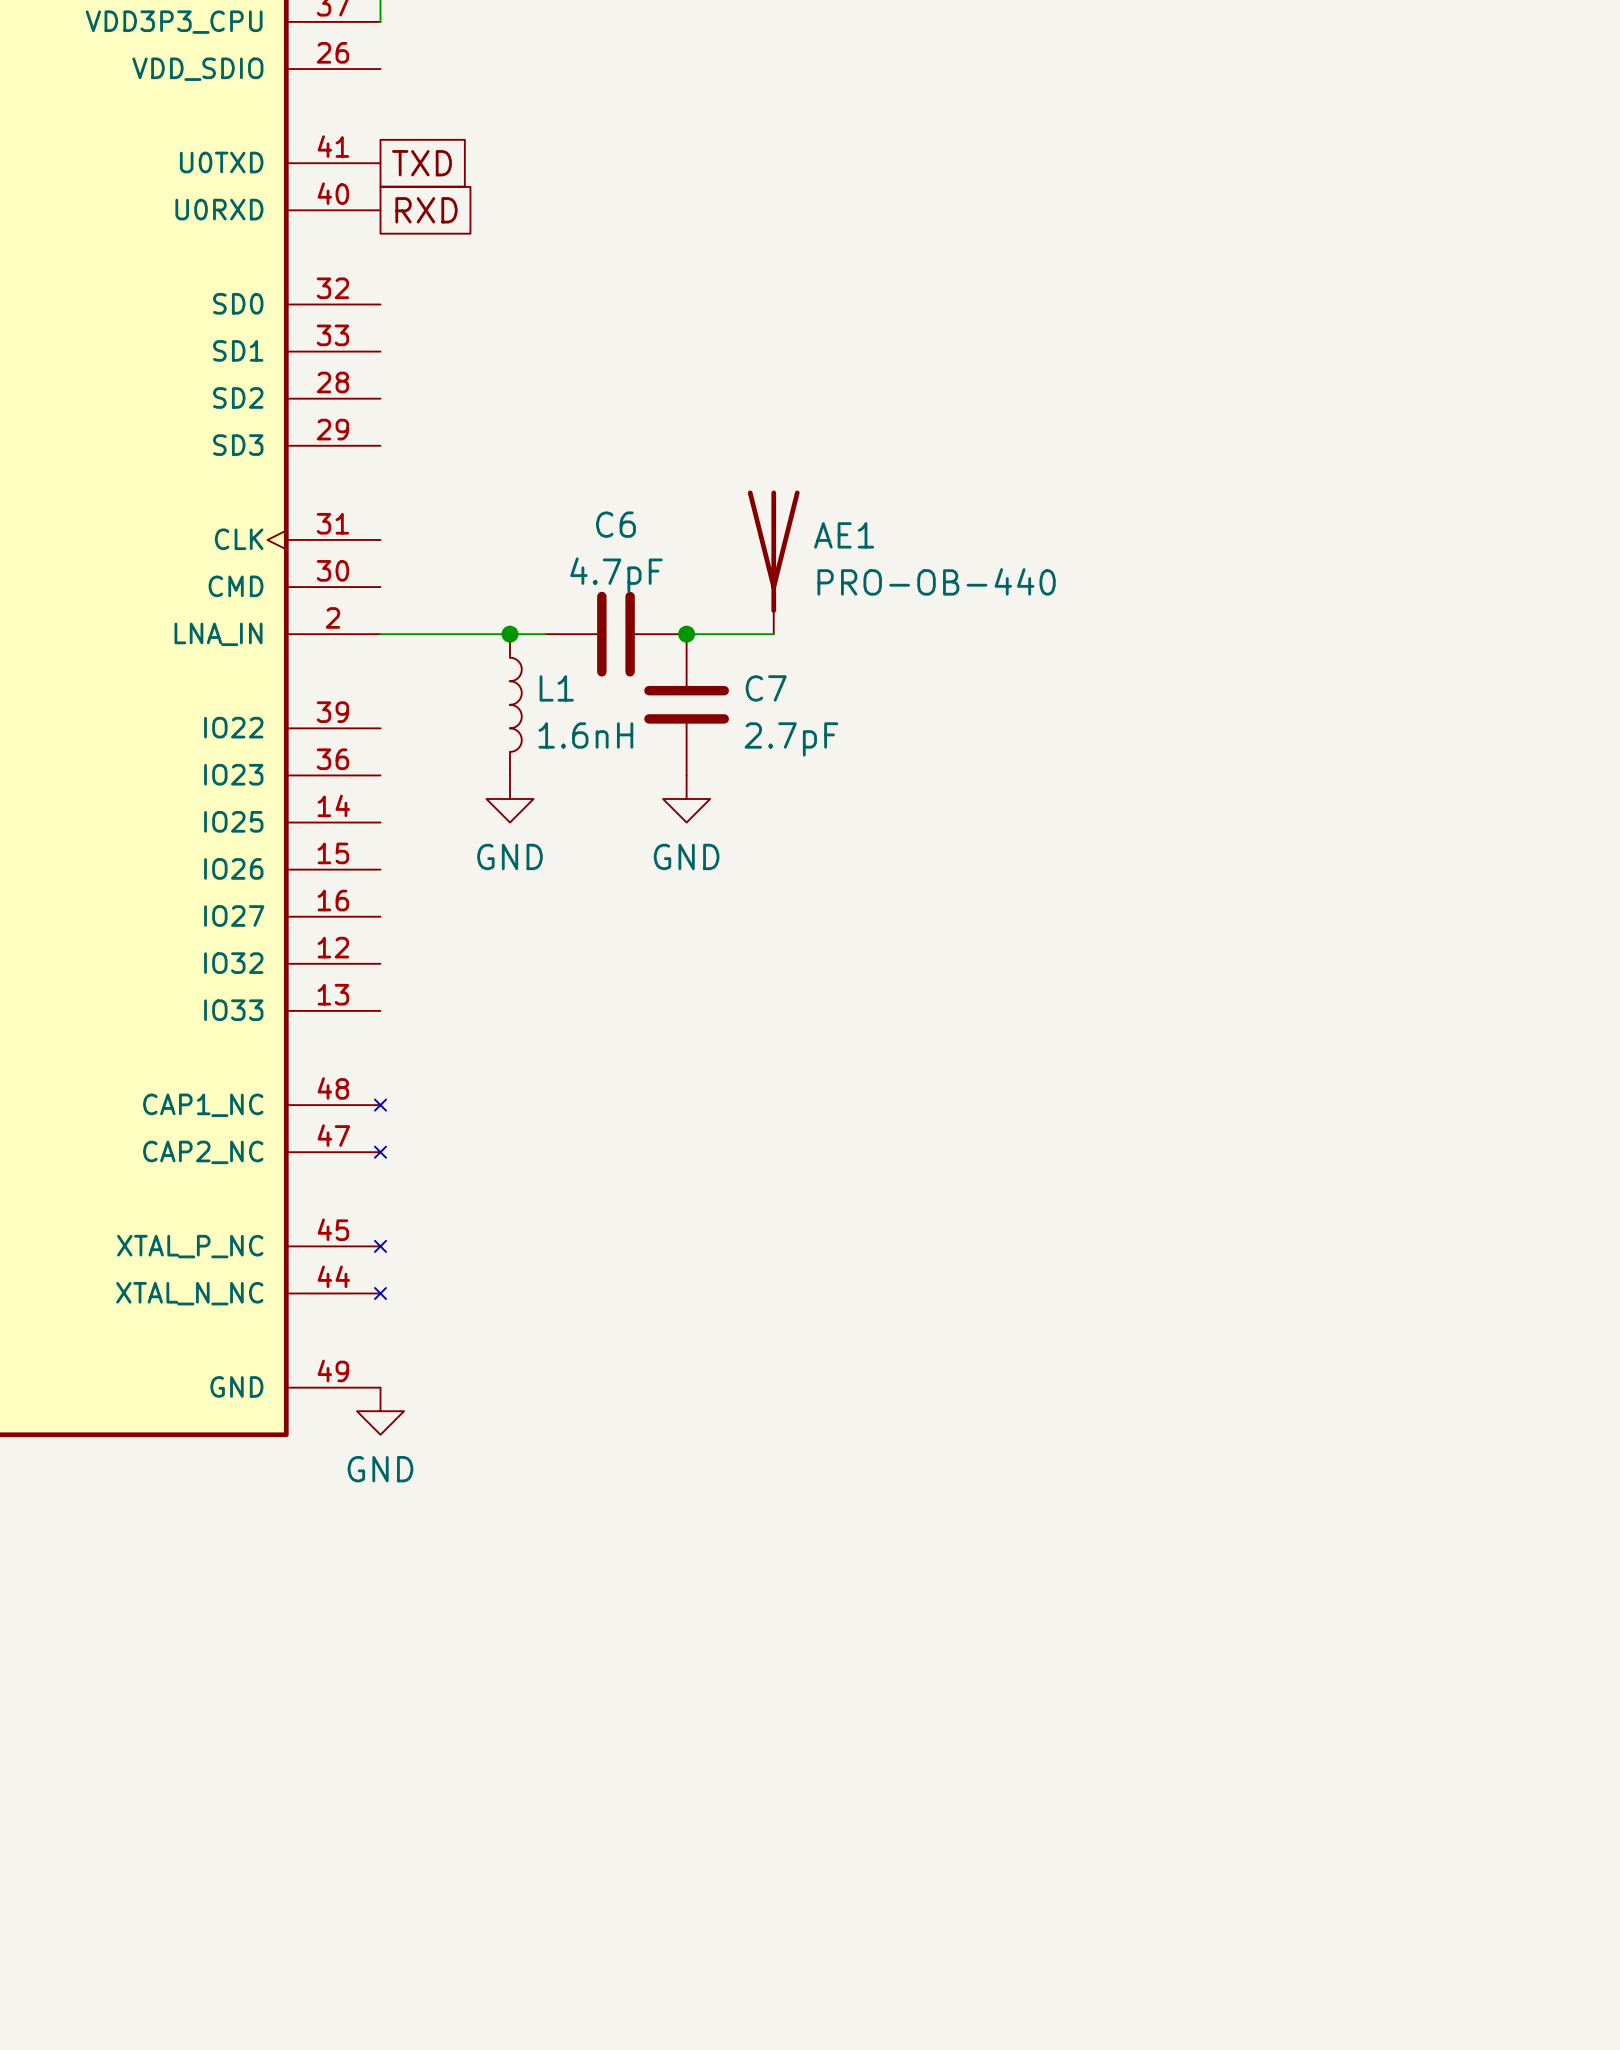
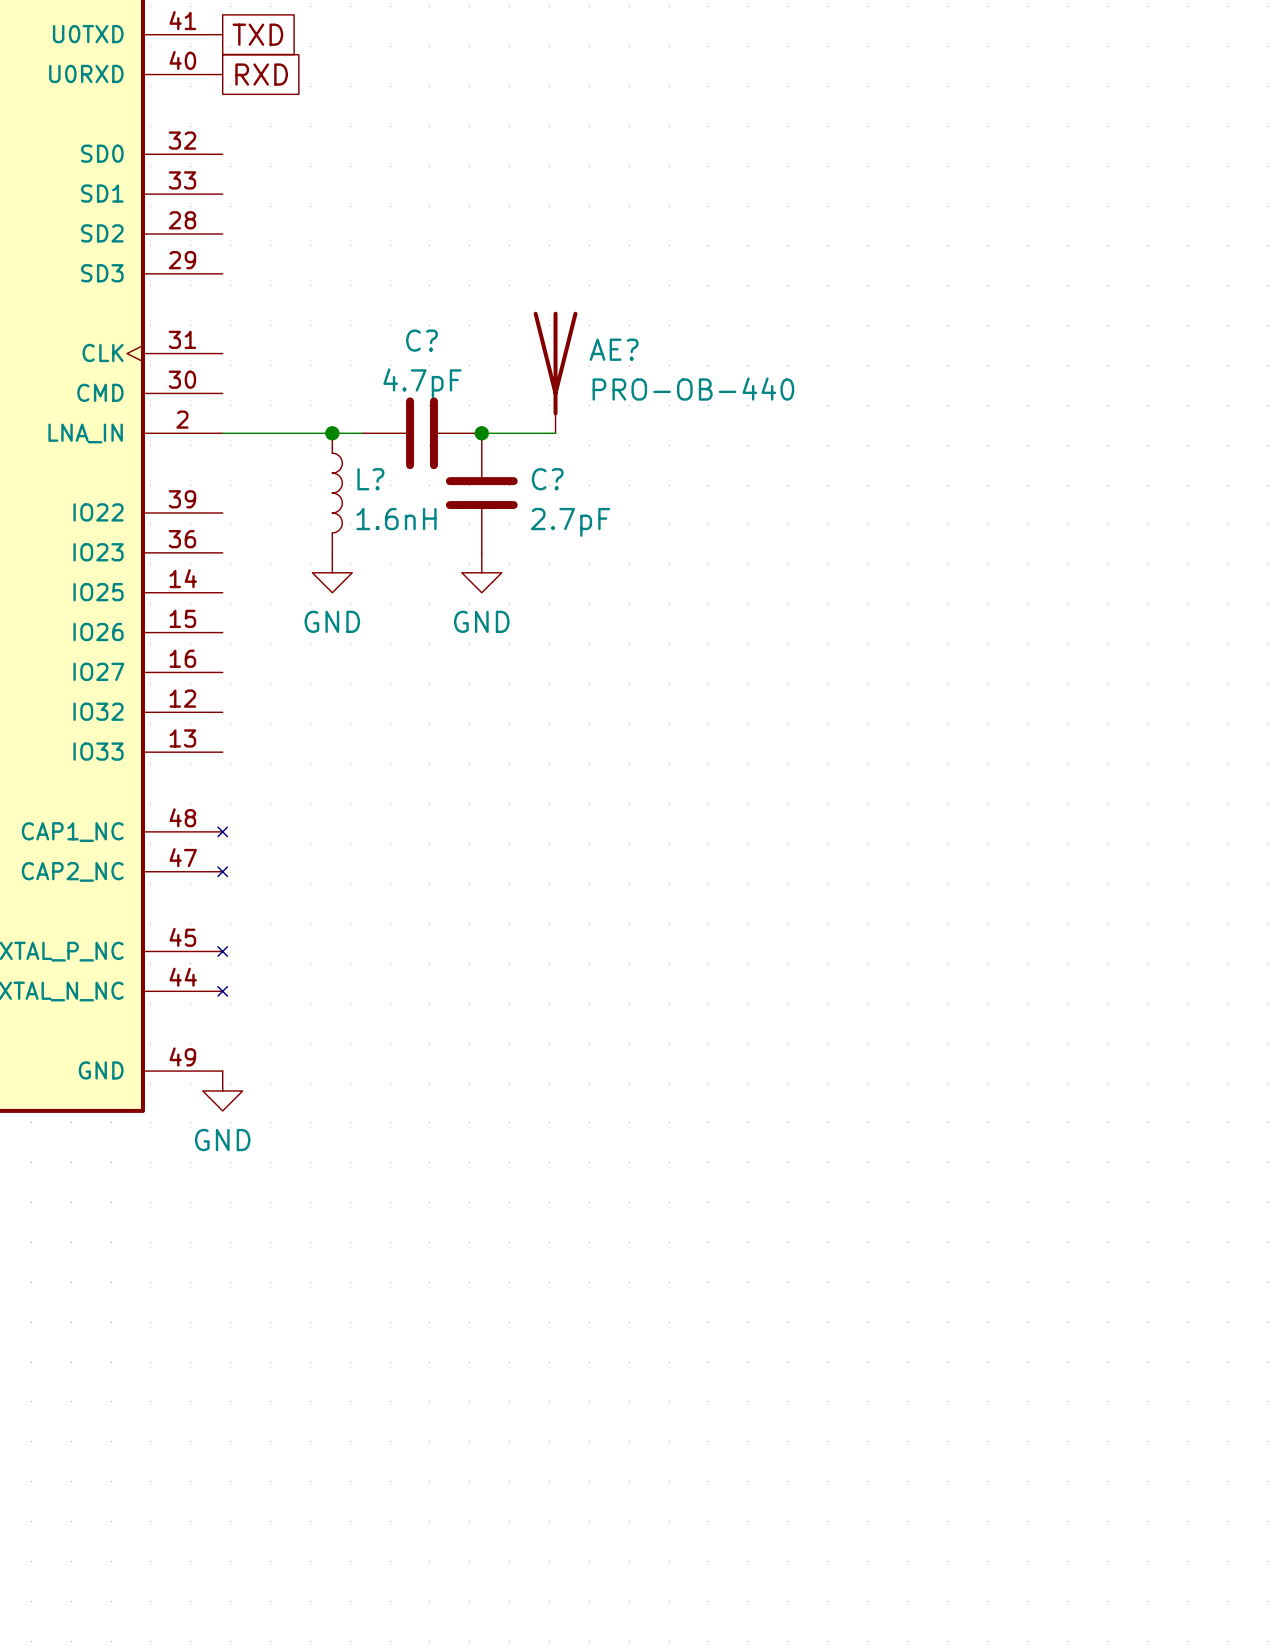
C6 name: C6 (615, 524) -> C? (422, 340)
AE1 name: AE1 (844, 535) -> AE? (614, 349)
L1 name: L1 (556, 688) -> L? (370, 479)
C7 name: C7 (766, 688) -> C? (547, 479)

